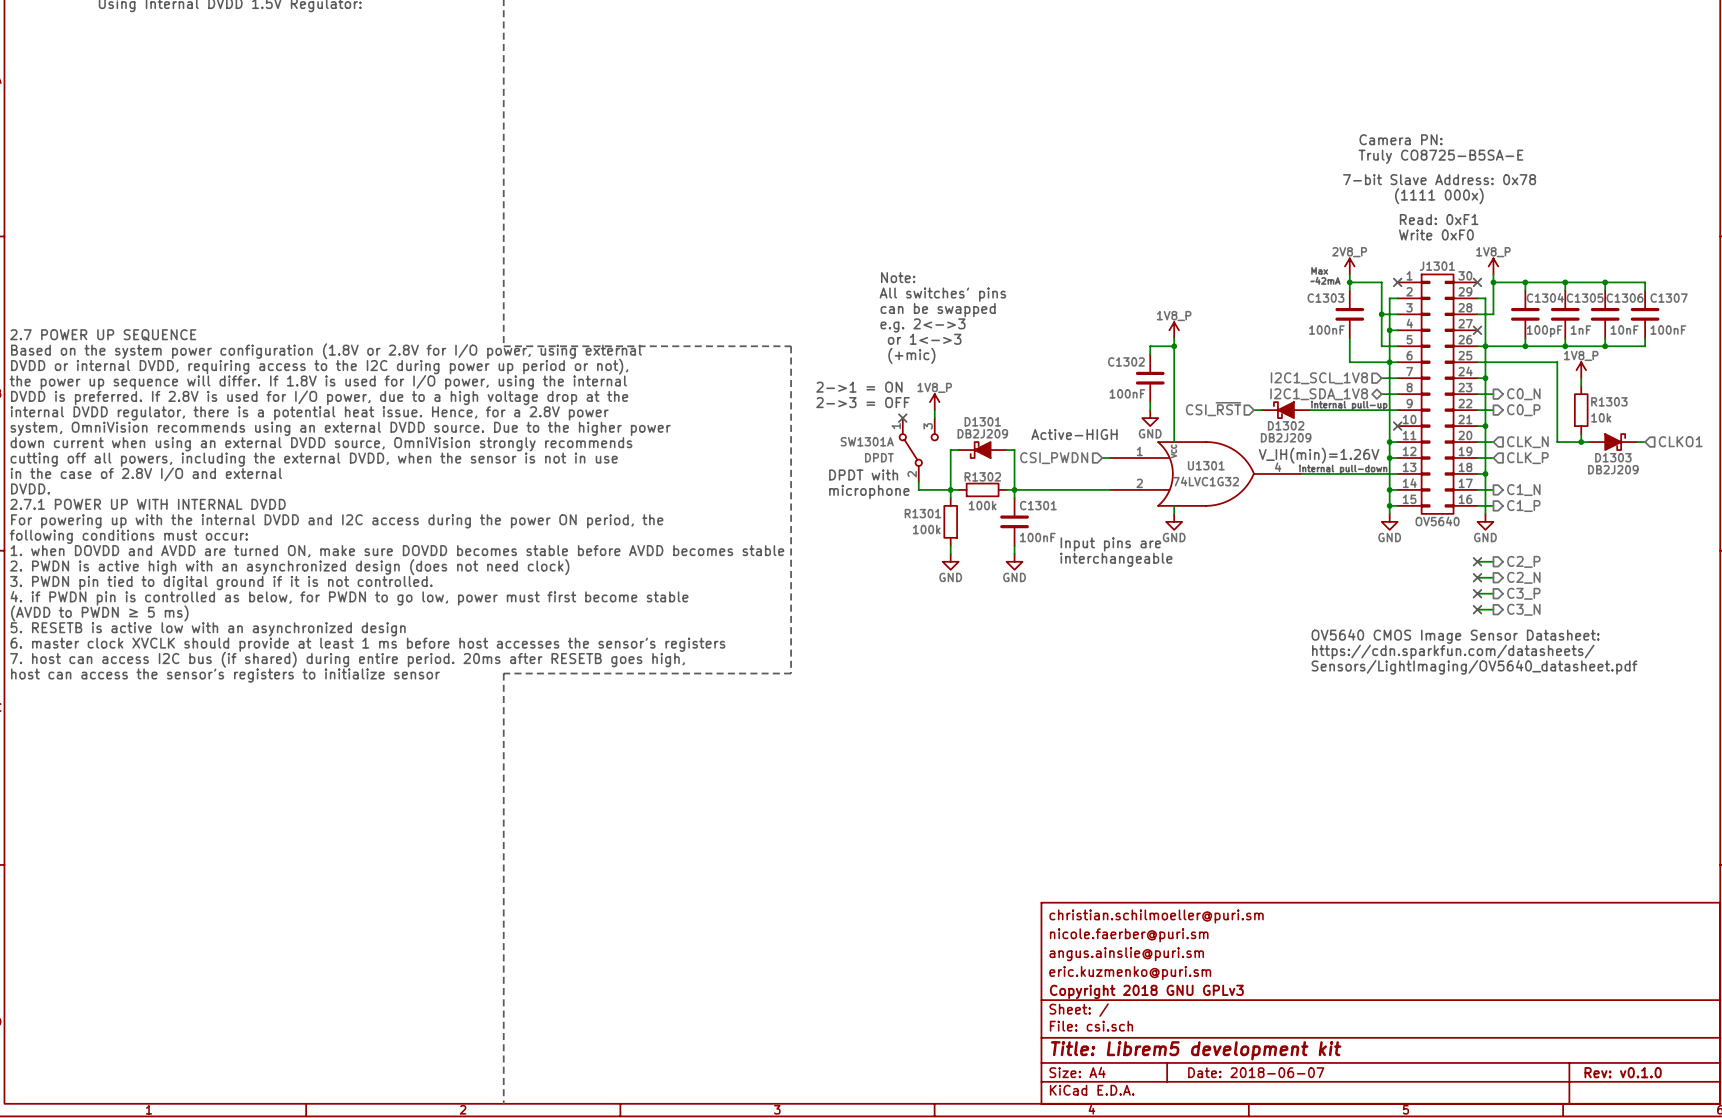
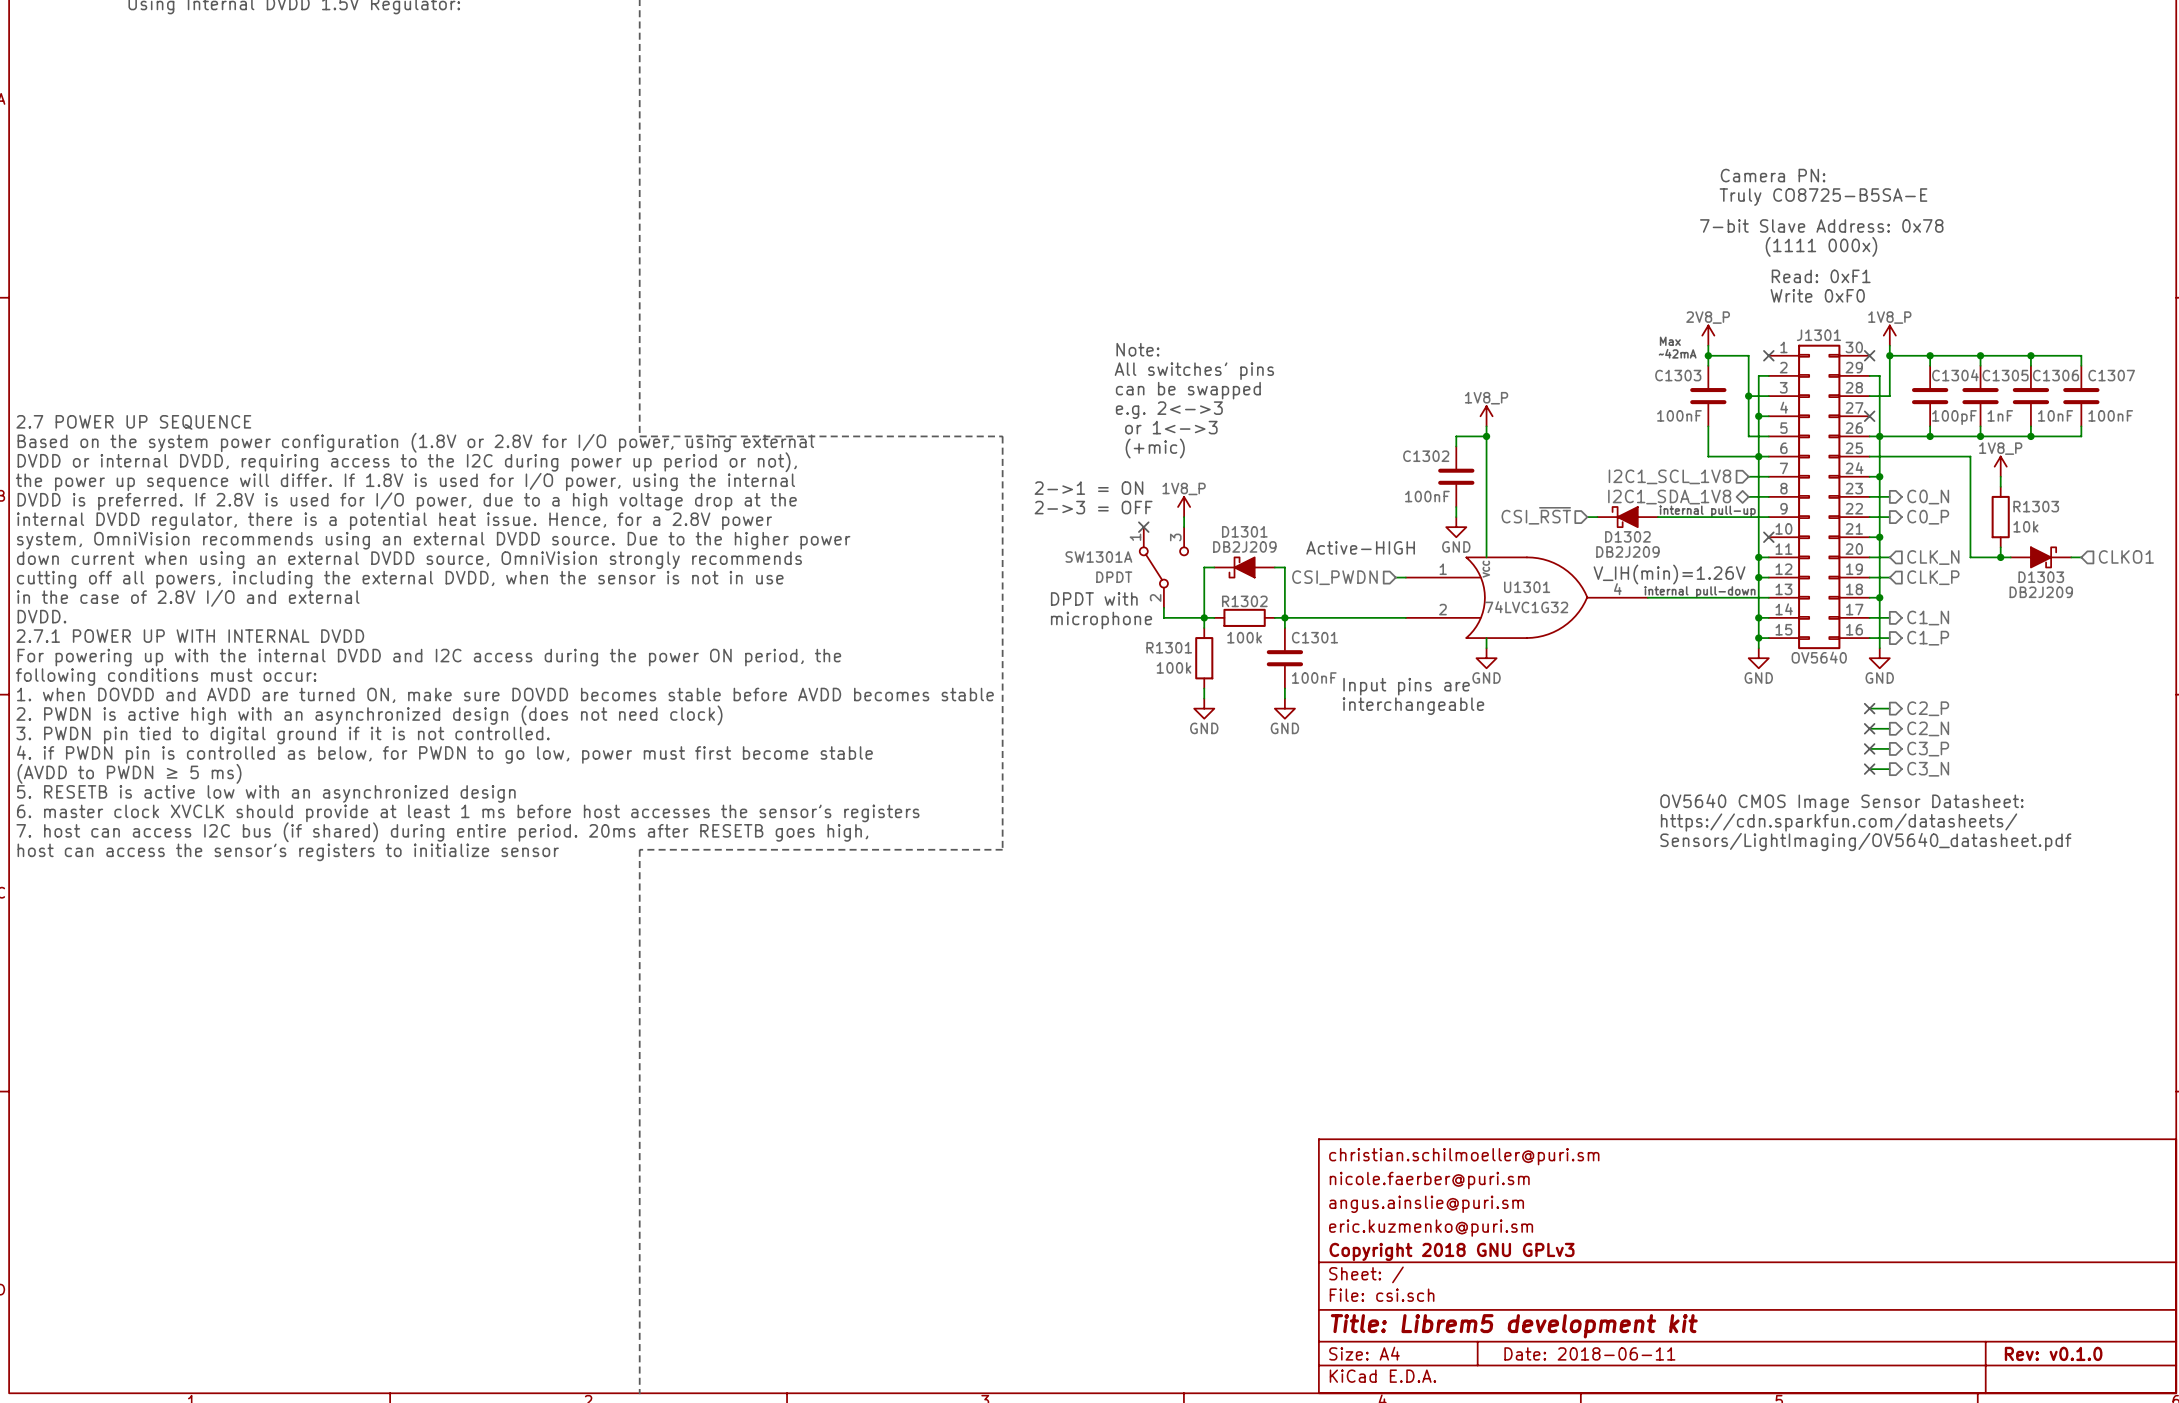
title block: Date: 2018-06-07 (1256, 1072) -> Date: 2018-06-11 (1589, 1353)

